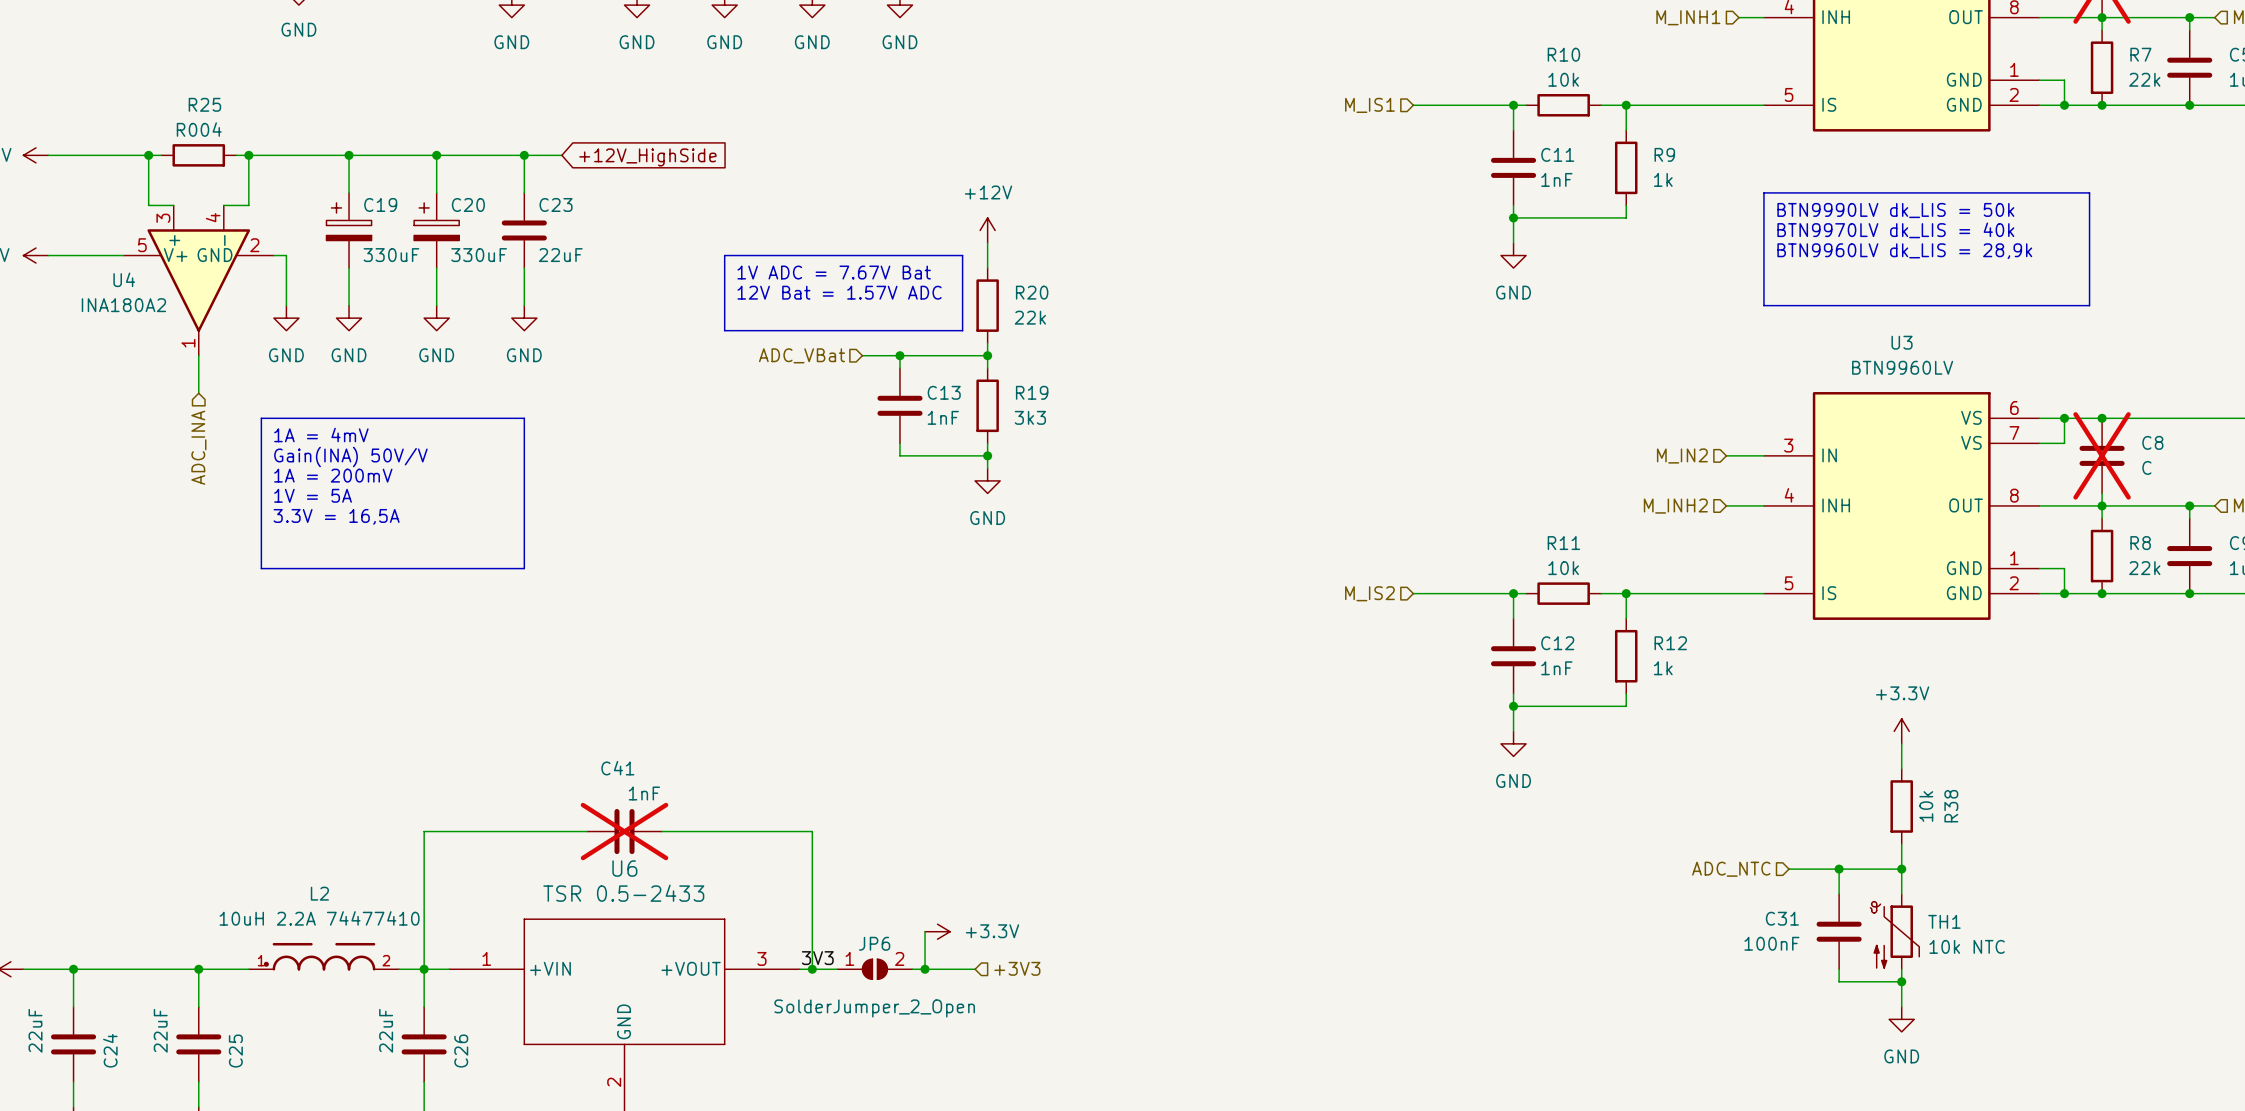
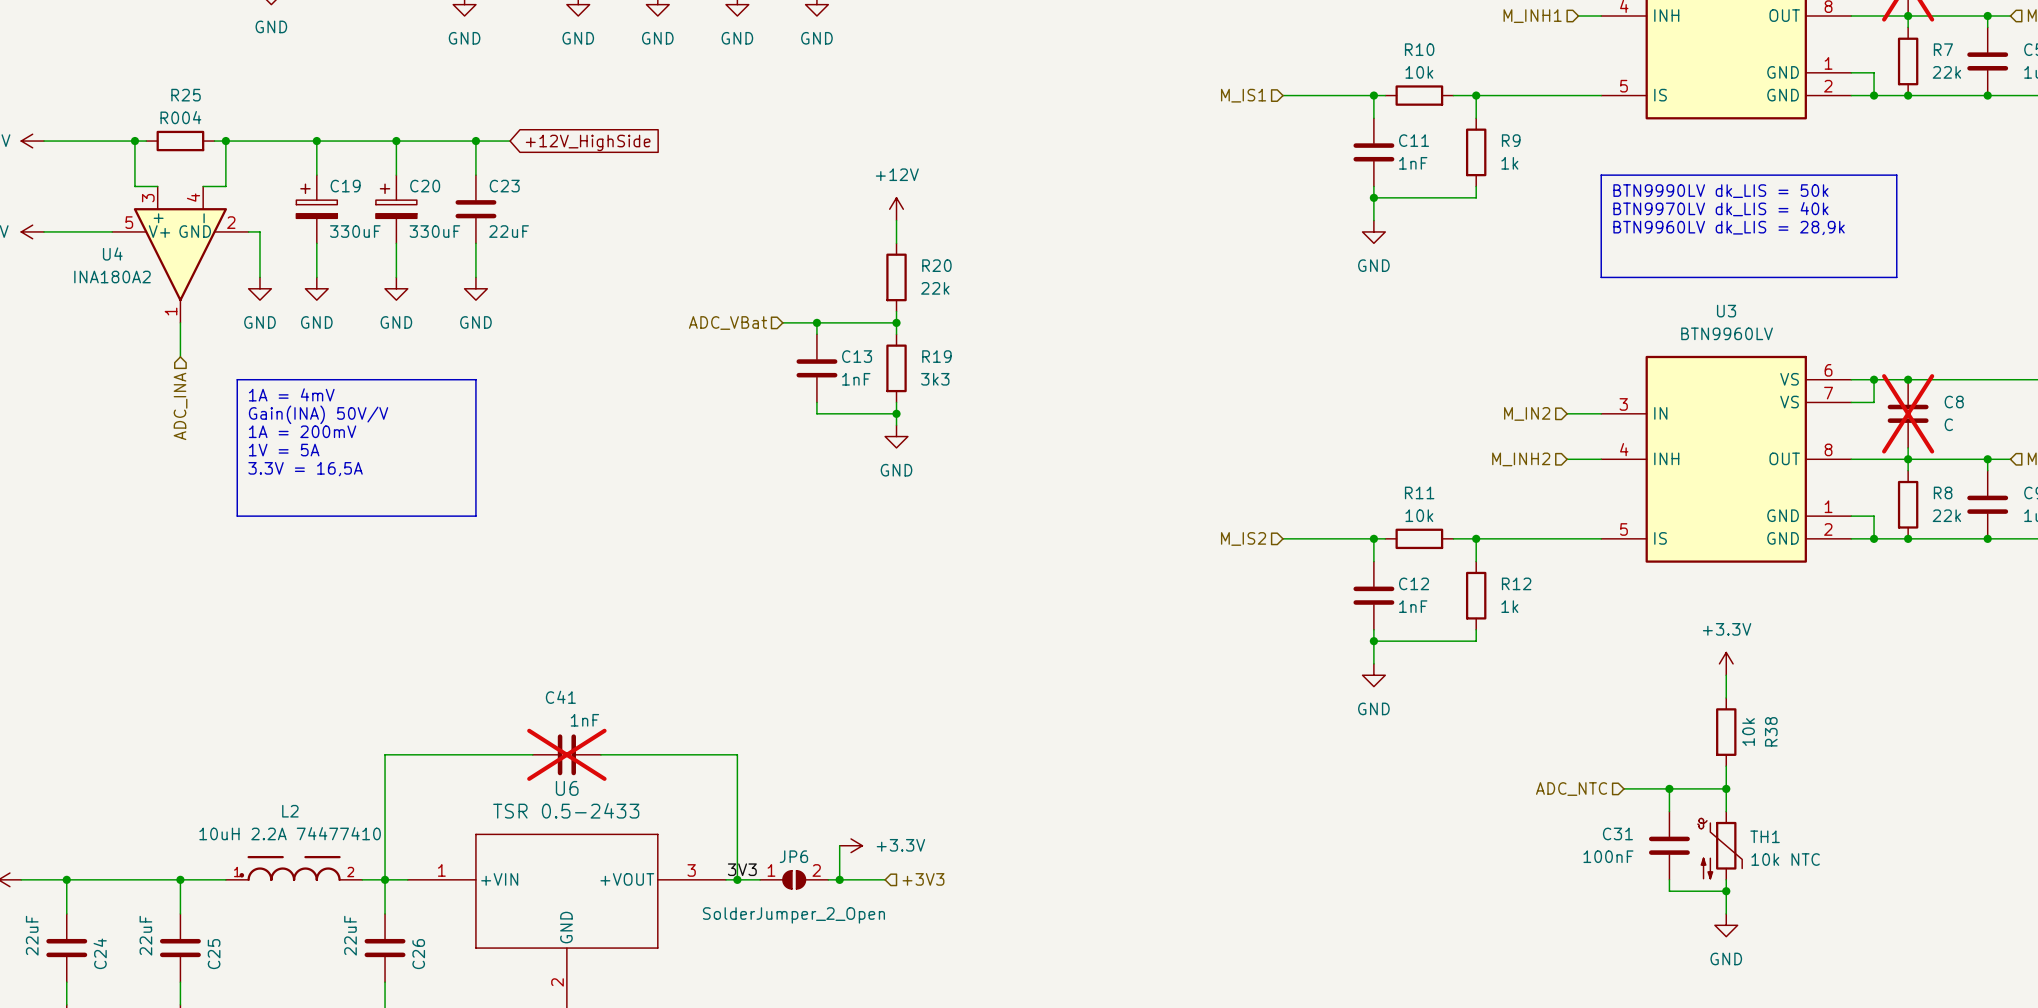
line: (724, 255) (962, 255) (962, 330) (724, 330) (724, 255) -> none
text: 1V ADC = 7.67V Bat (834, 272) -> none
text: 12V Bat = 1.57V ADC (839, 292) -> none

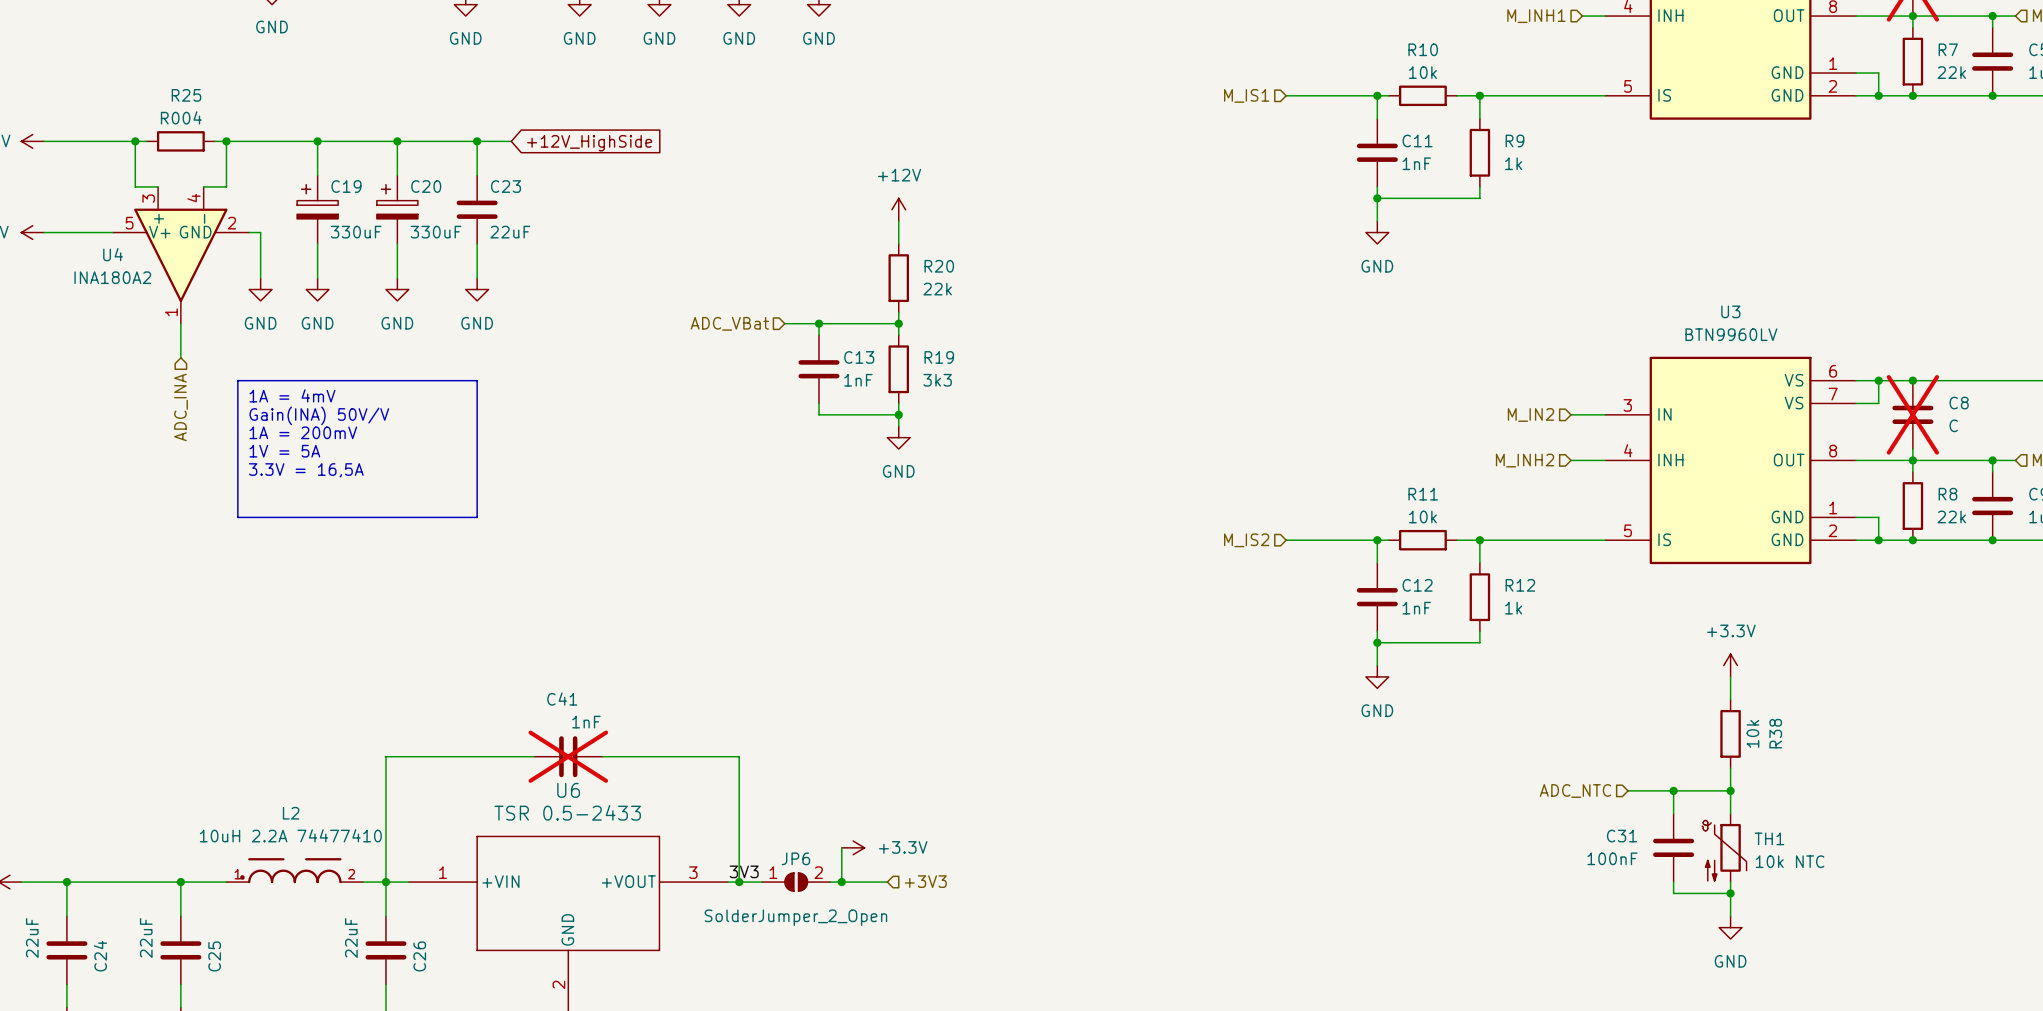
line: (1601, 175) (1896, 175) (1896, 277) (1601, 277) (1601, 175) -> none
text: BTN9990LV dk_LIS = 50k (1720, 191) -> none
text: BTN9970LV dk_LIS = 40k (1720, 209) -> none
text: BTN9960LV dk_LIS = 28,9k (1729, 227) -> none

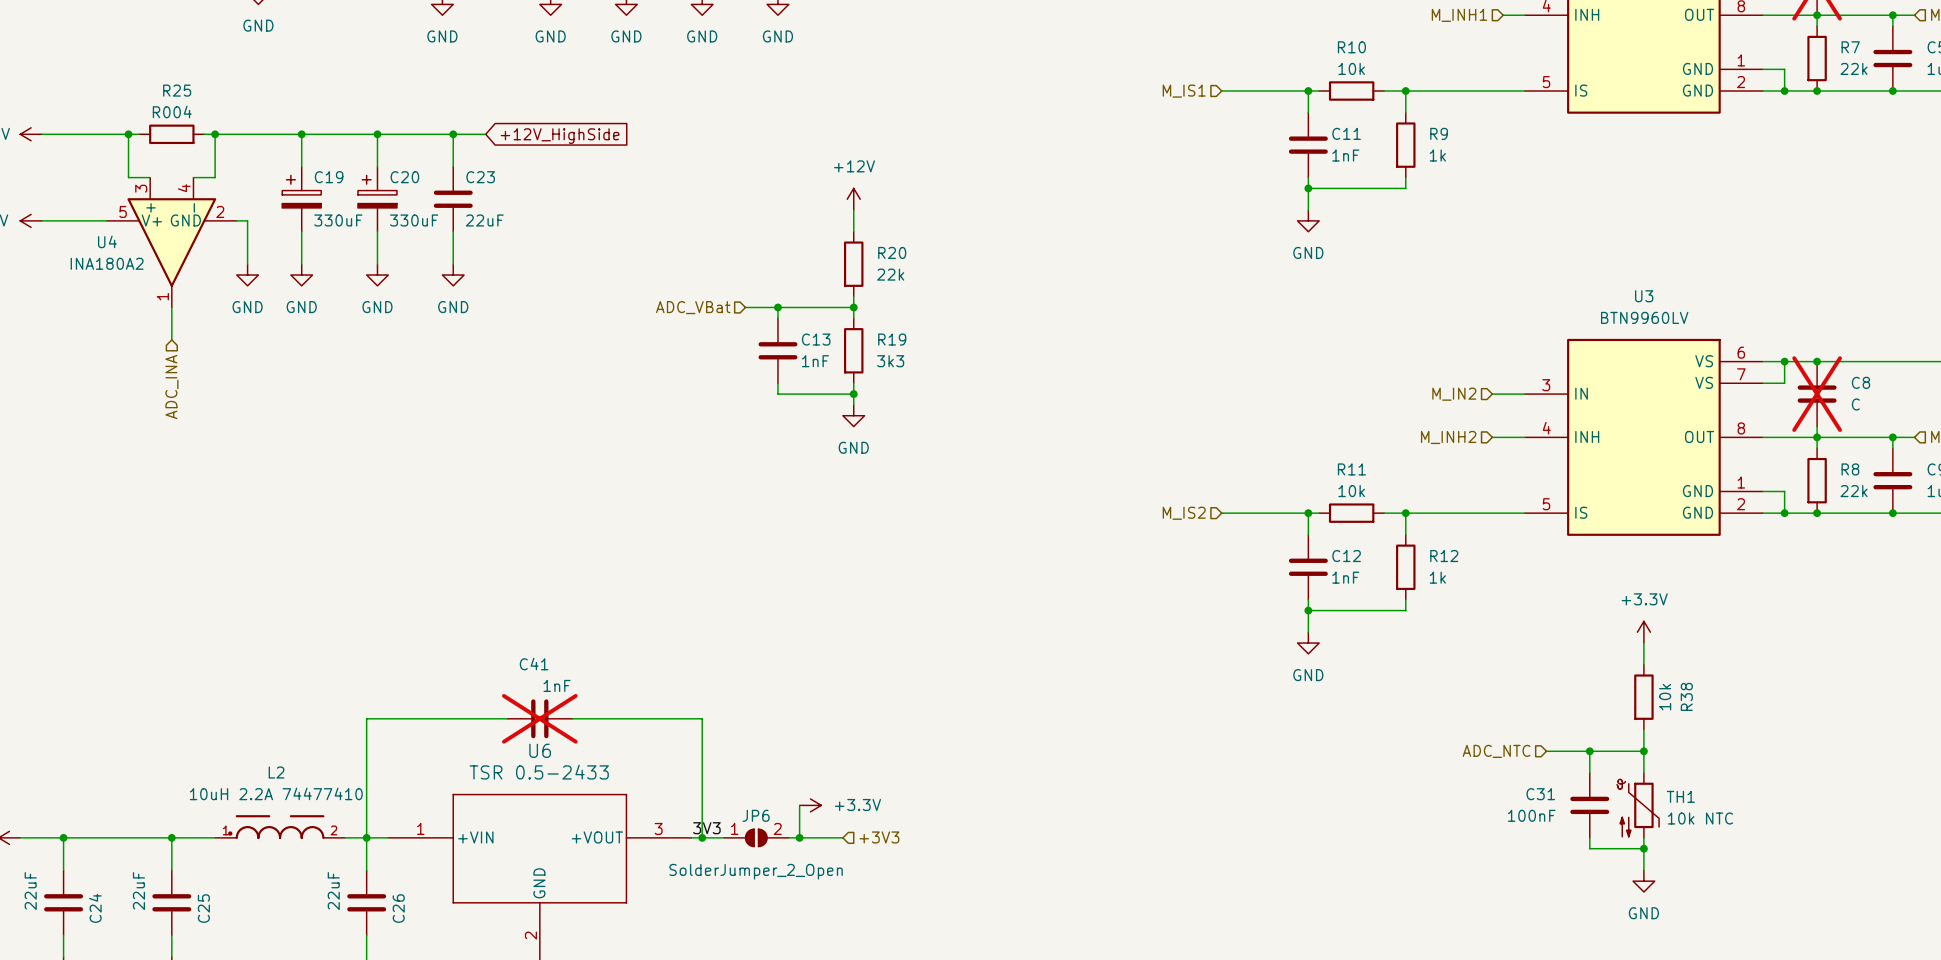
line: (237, 380) (477, 380) (477, 517) (237, 517) (237, 380) -> none
text: 1A = 4mV (292, 395) -> none
text: Gain(INA) 50V/V (319, 415) -> none
text: 1A = 200mV (303, 432) -> none
text: 1V = 5A (284, 451) -> none
text: 3.3V = 16,5A (306, 470) -> none

